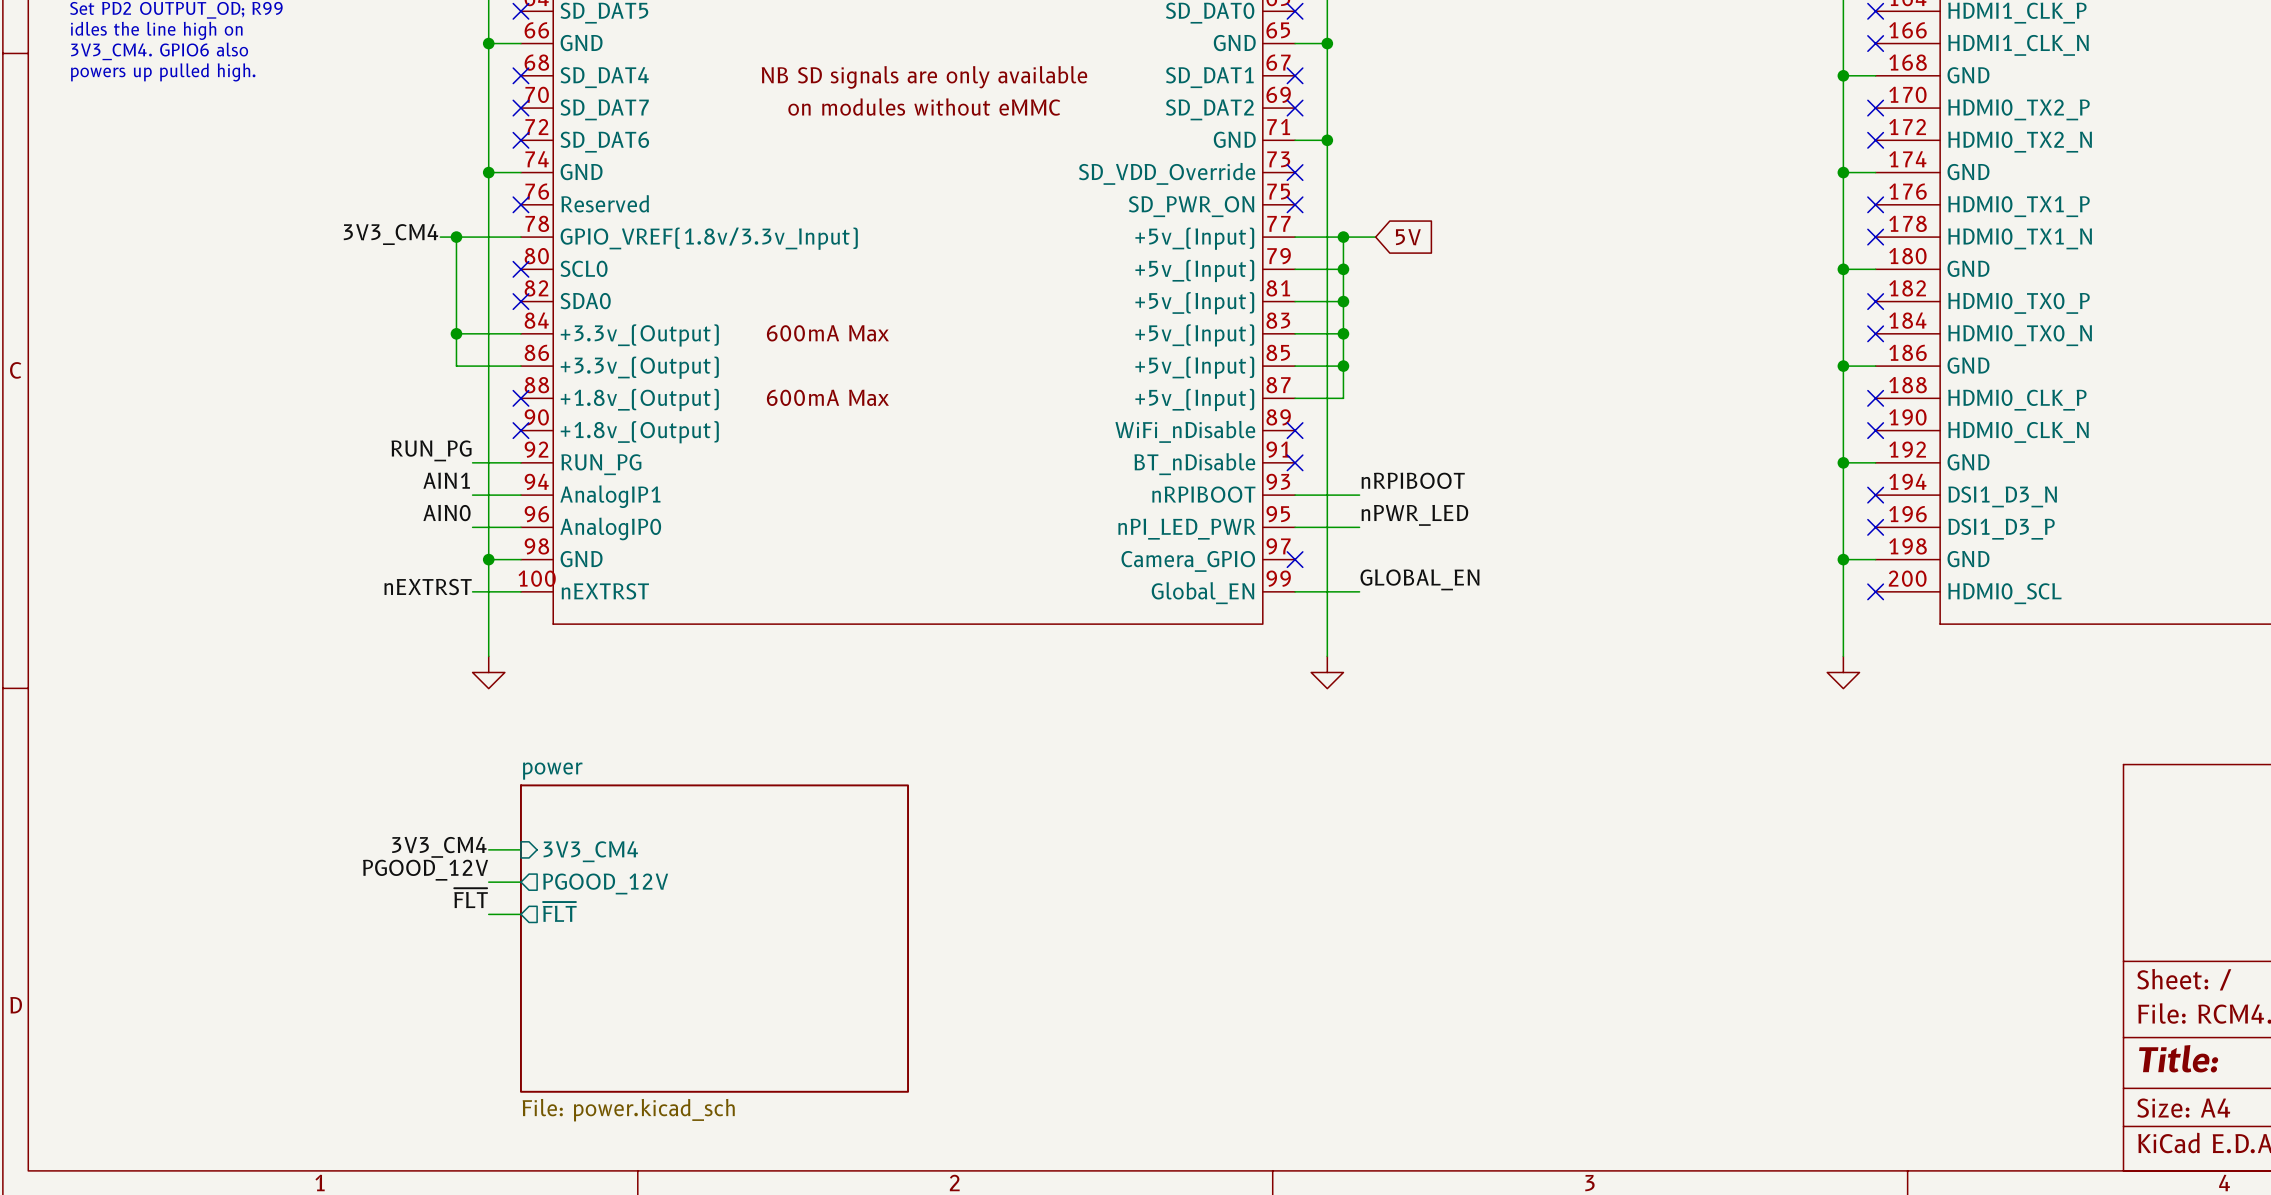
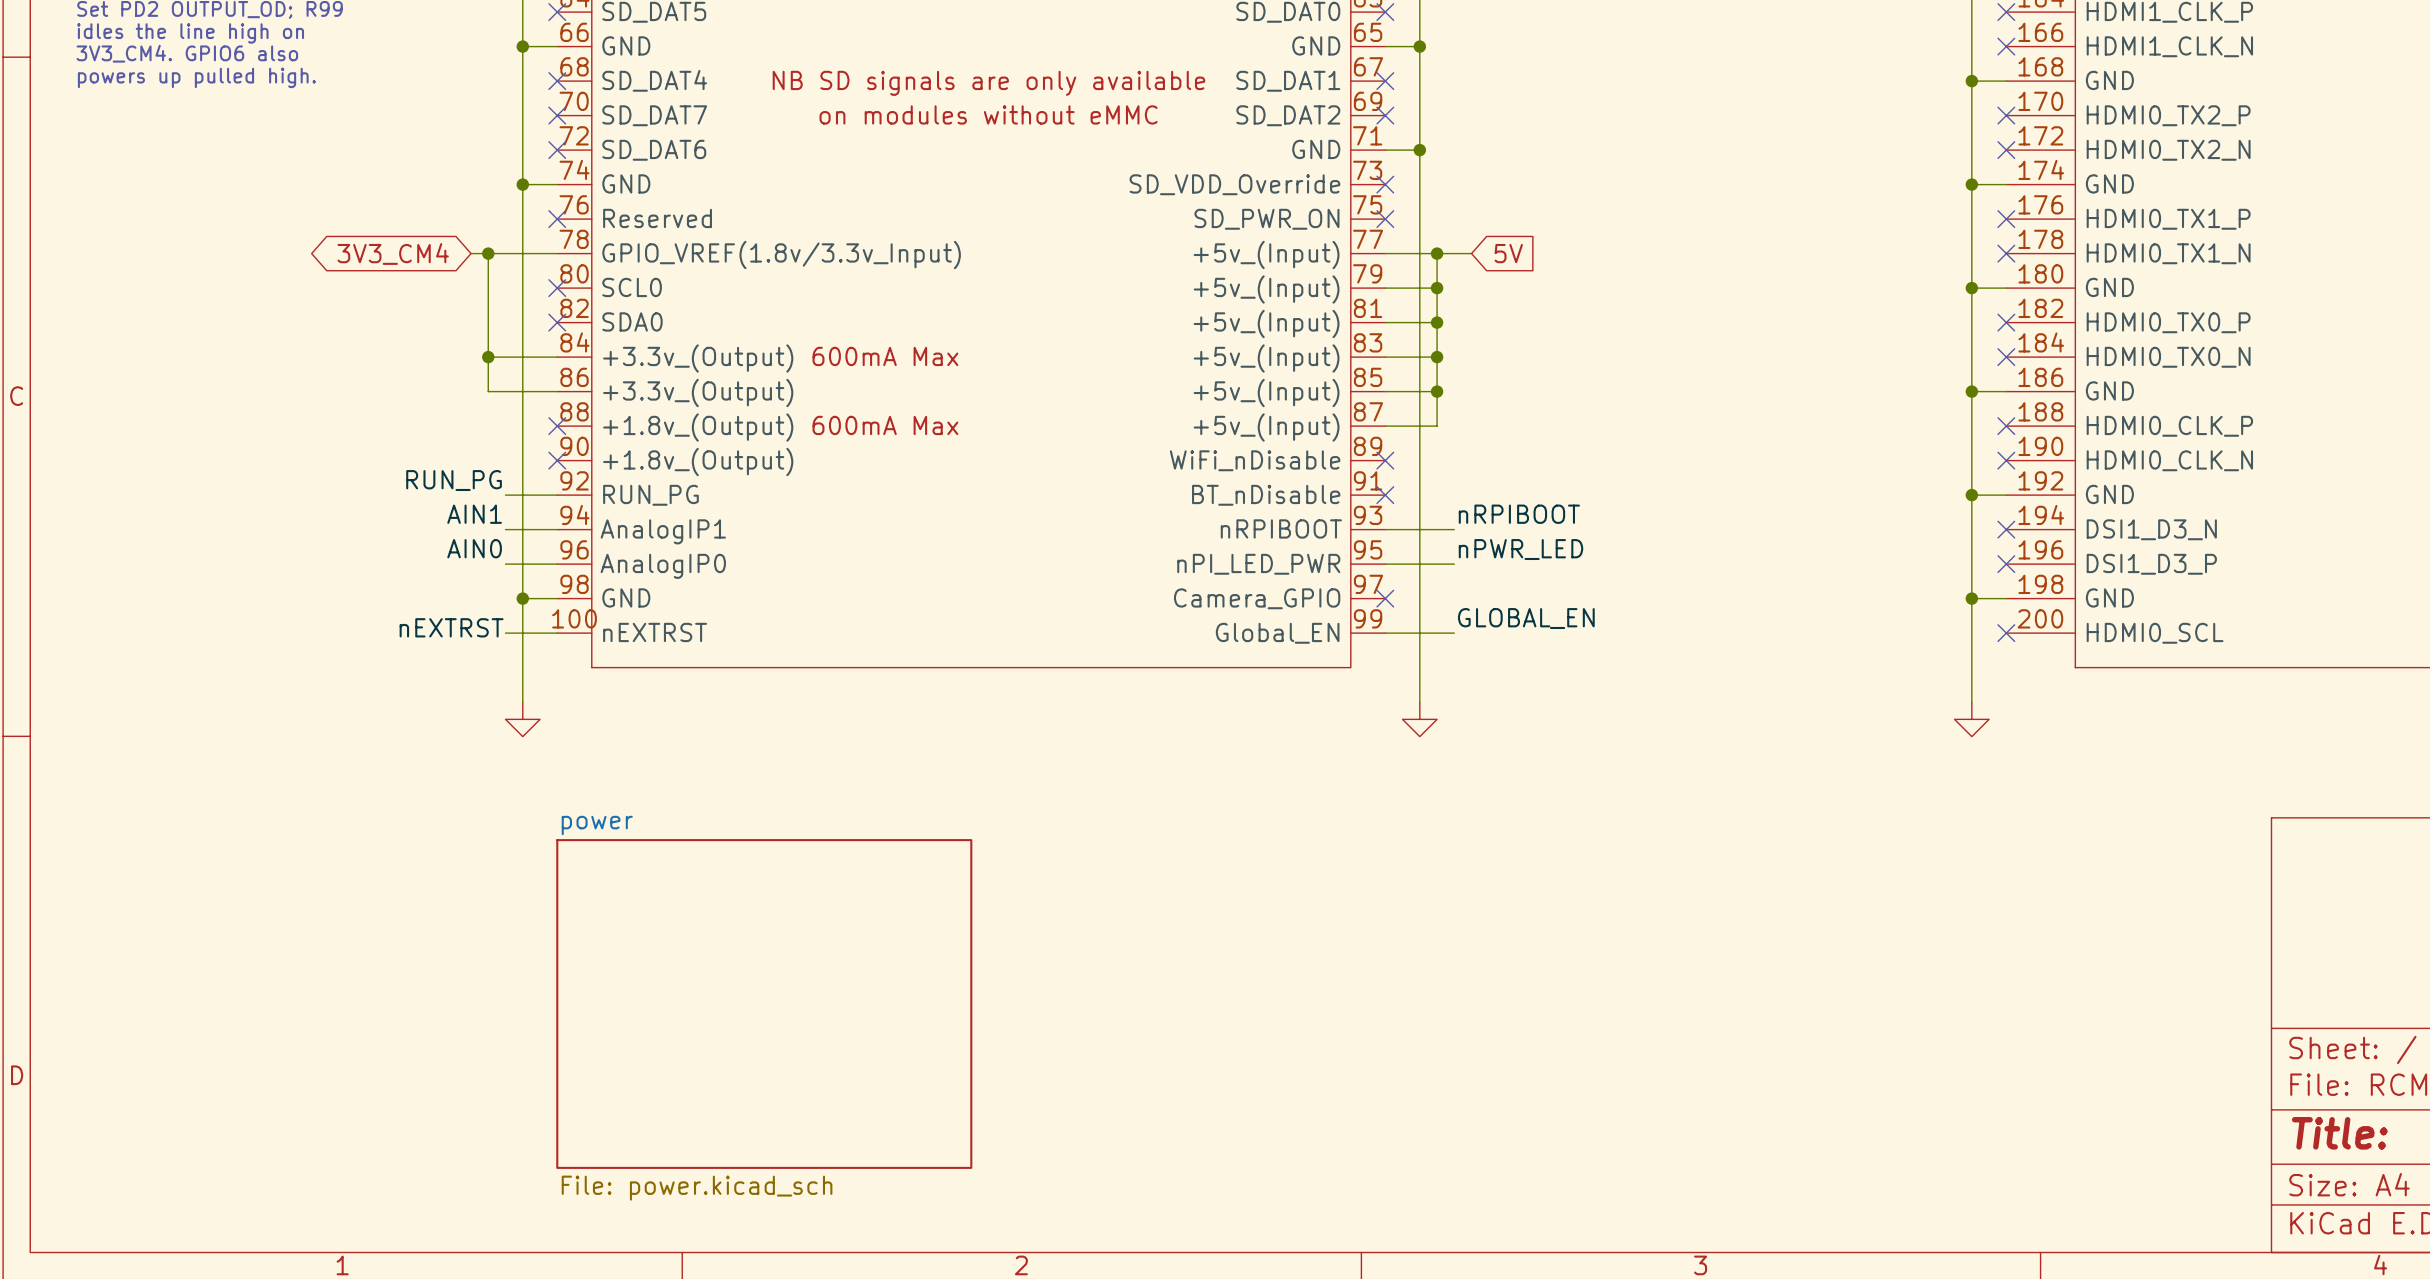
label: 3V3_CM4 (391, 234) -> none
global label: none -> 3V3_CM4 (393, 254)
label: 3V3_CM4 (439, 847) -> none
wire: (488, 849) (520, 849) -> none
sheet pin: 3V3_CM4 (590, 851) -> none
label: PGOOD_12V (425, 870) -> none
wire: (488, 882) (520, 882) -> none
sheet pin: PGOOD_12V (605, 883) -> none
label: ~{FLT} (471, 898) -> none
sheet pin: ~{FLT} (559, 911) -> none
wire: (488, 914) (520, 914) -> none

